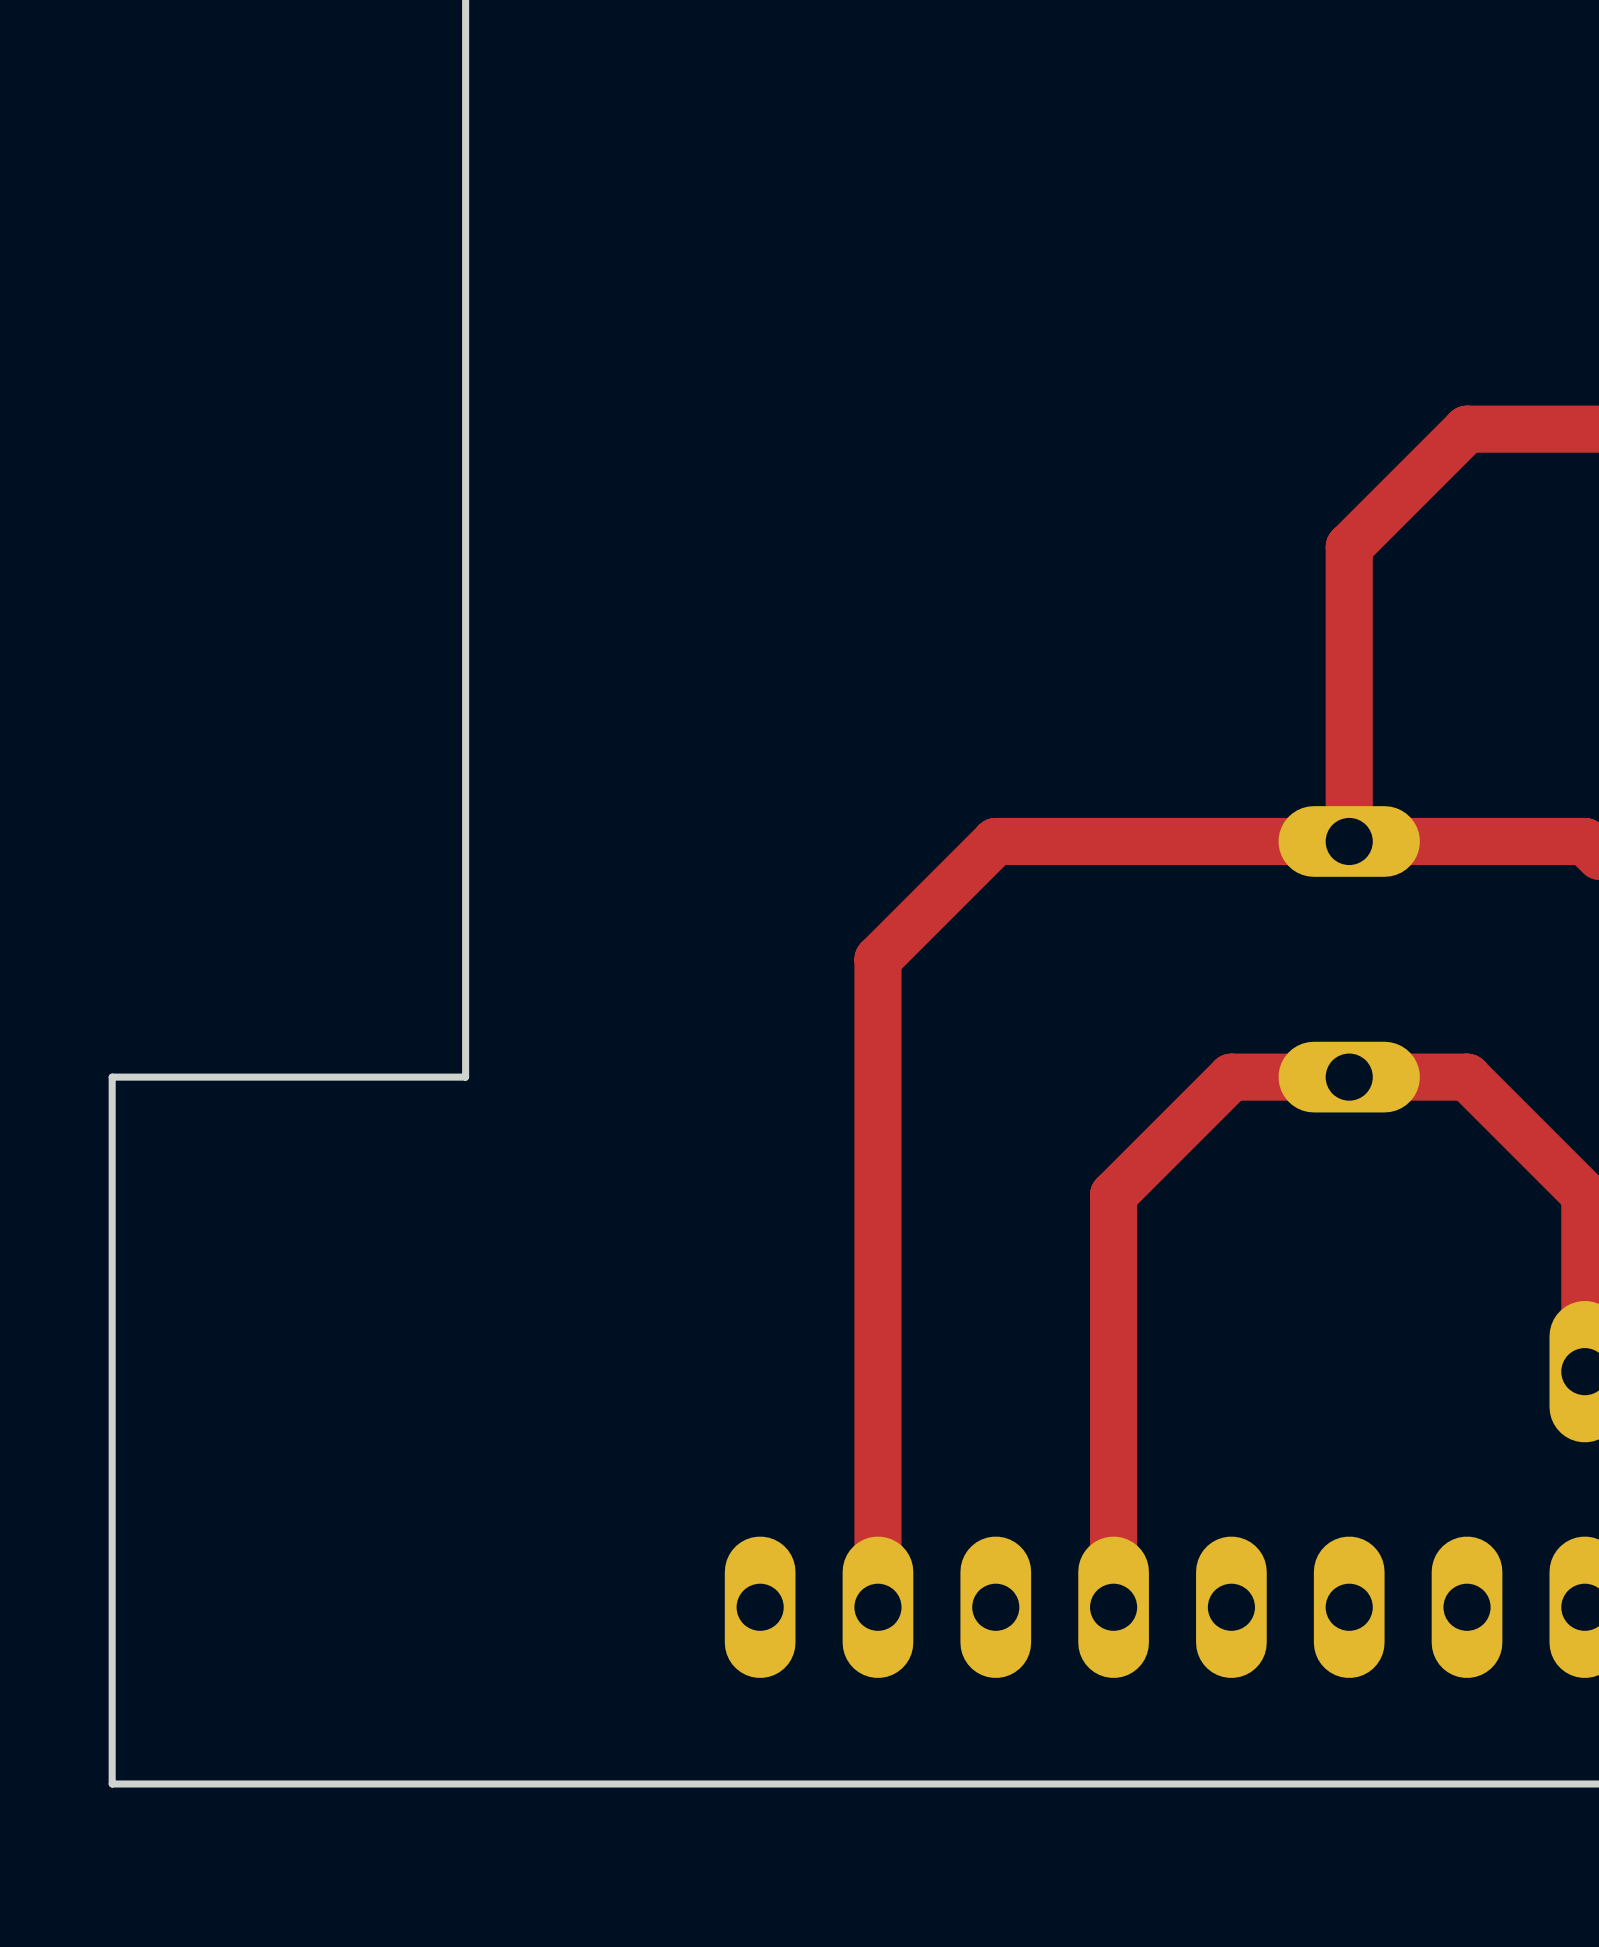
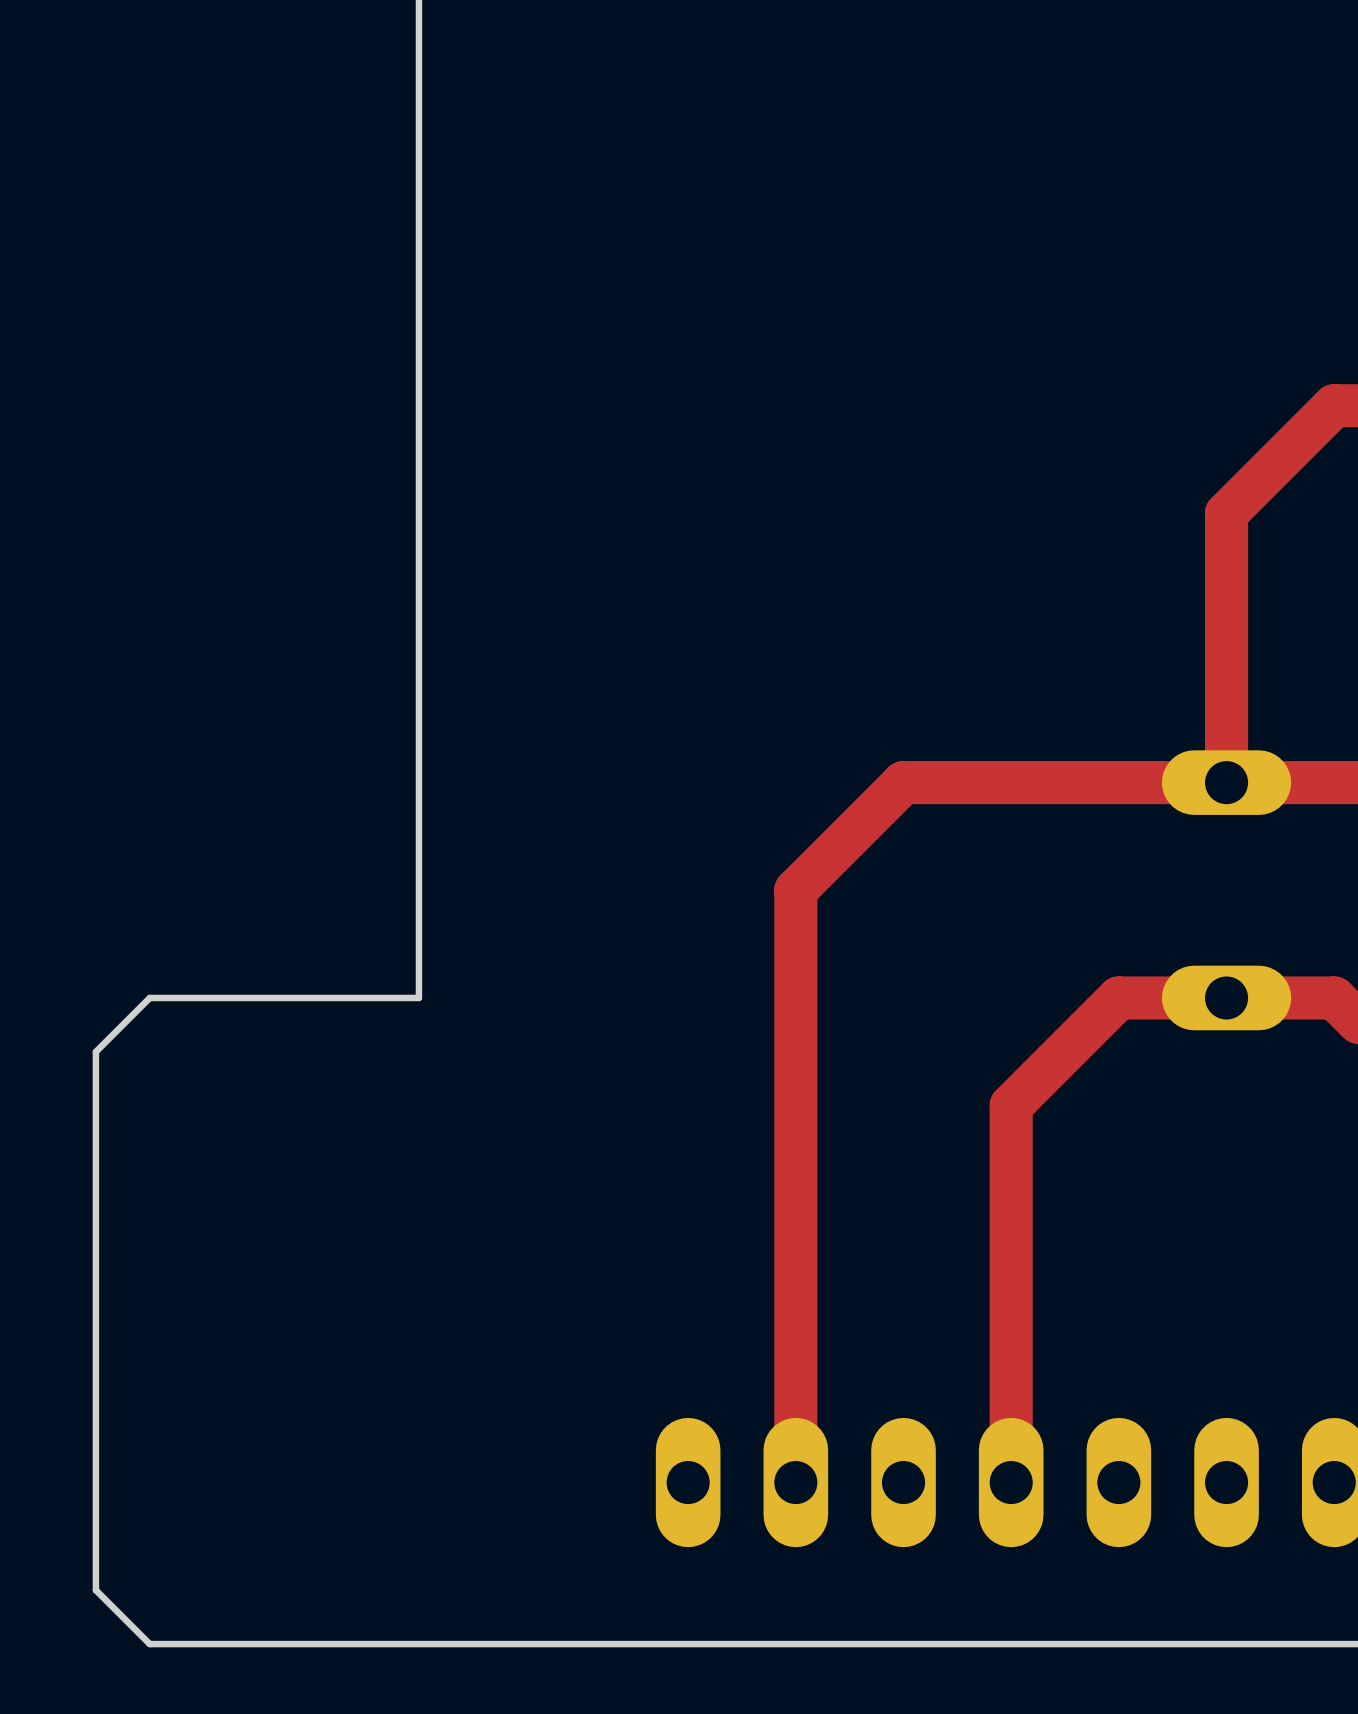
board edge: (171, 1077) (112, 1077) (112, 1136) -> (149, 997) (95, 1051)
board edge: (112, 1725) (112, 1783) (171, 1783) -> (95, 1590) (149, 1644)

